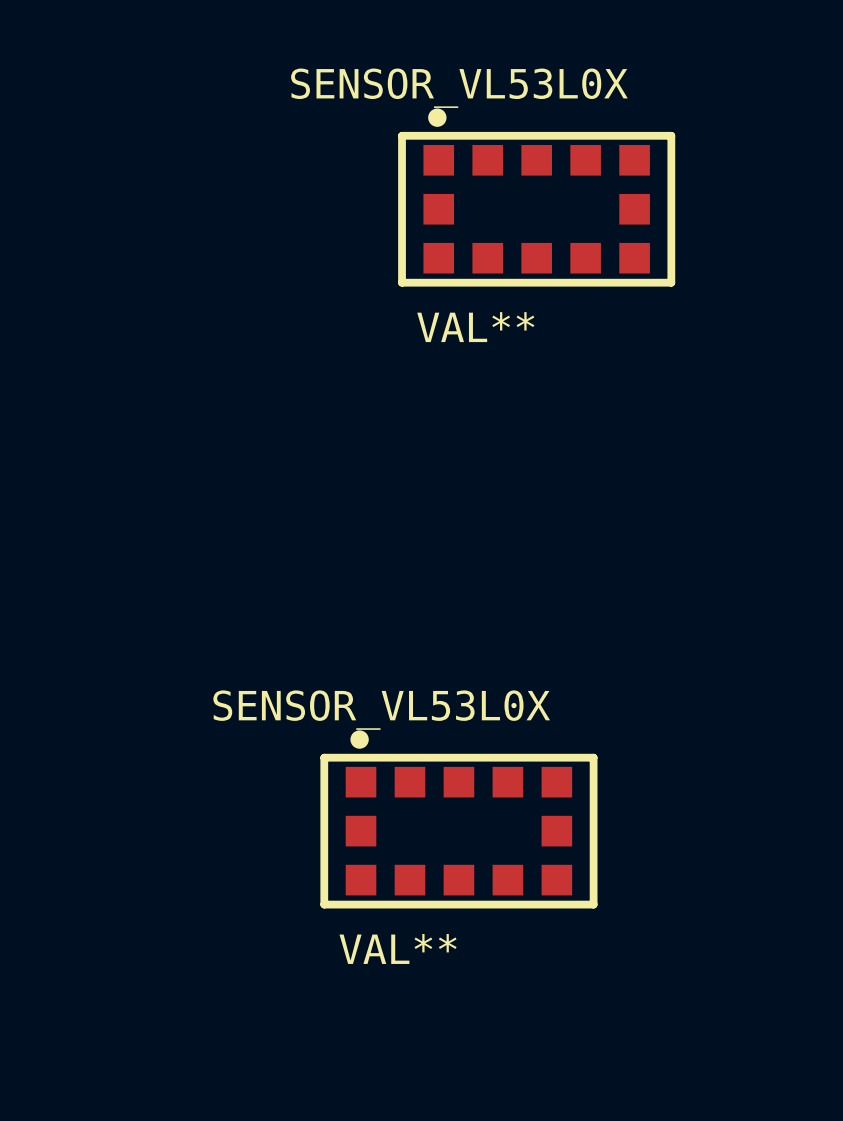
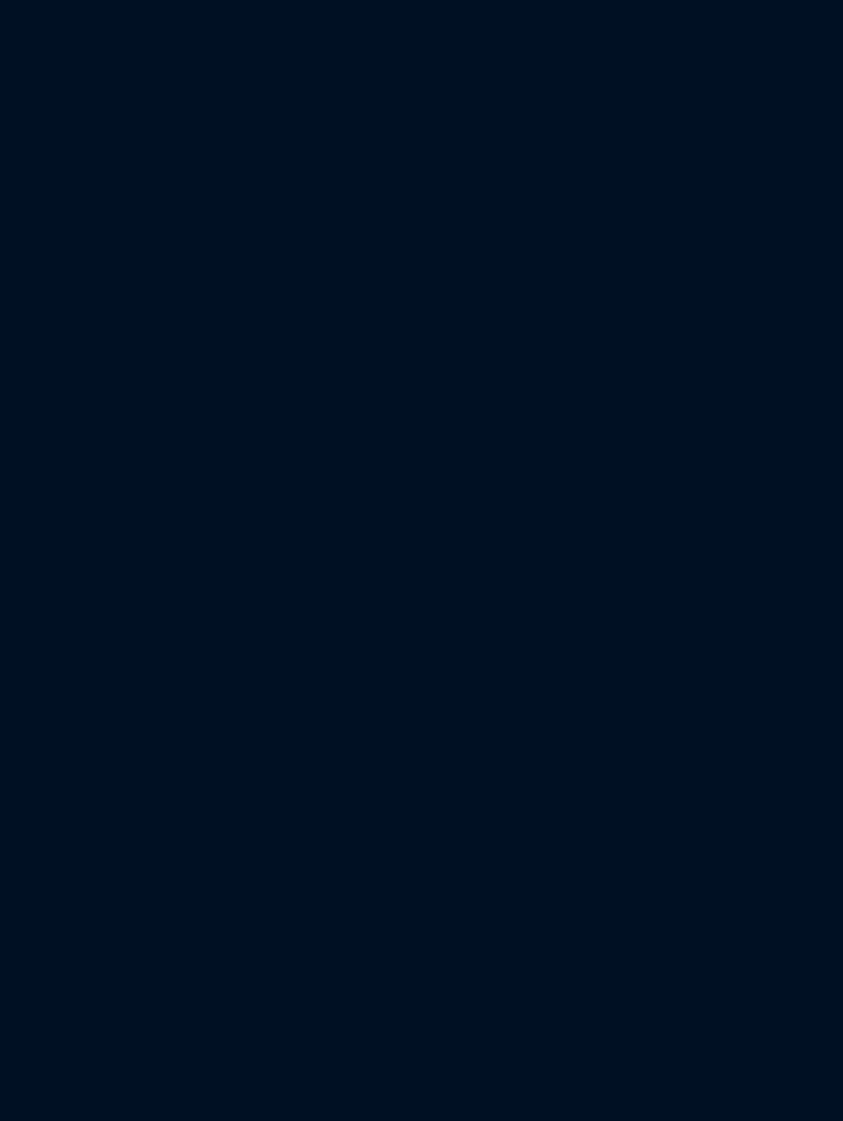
SENSOR_VL53L0X: VAL** (536, 197) -> none
SENSOR_VL53L0X: VAL** (458, 819) -> none

